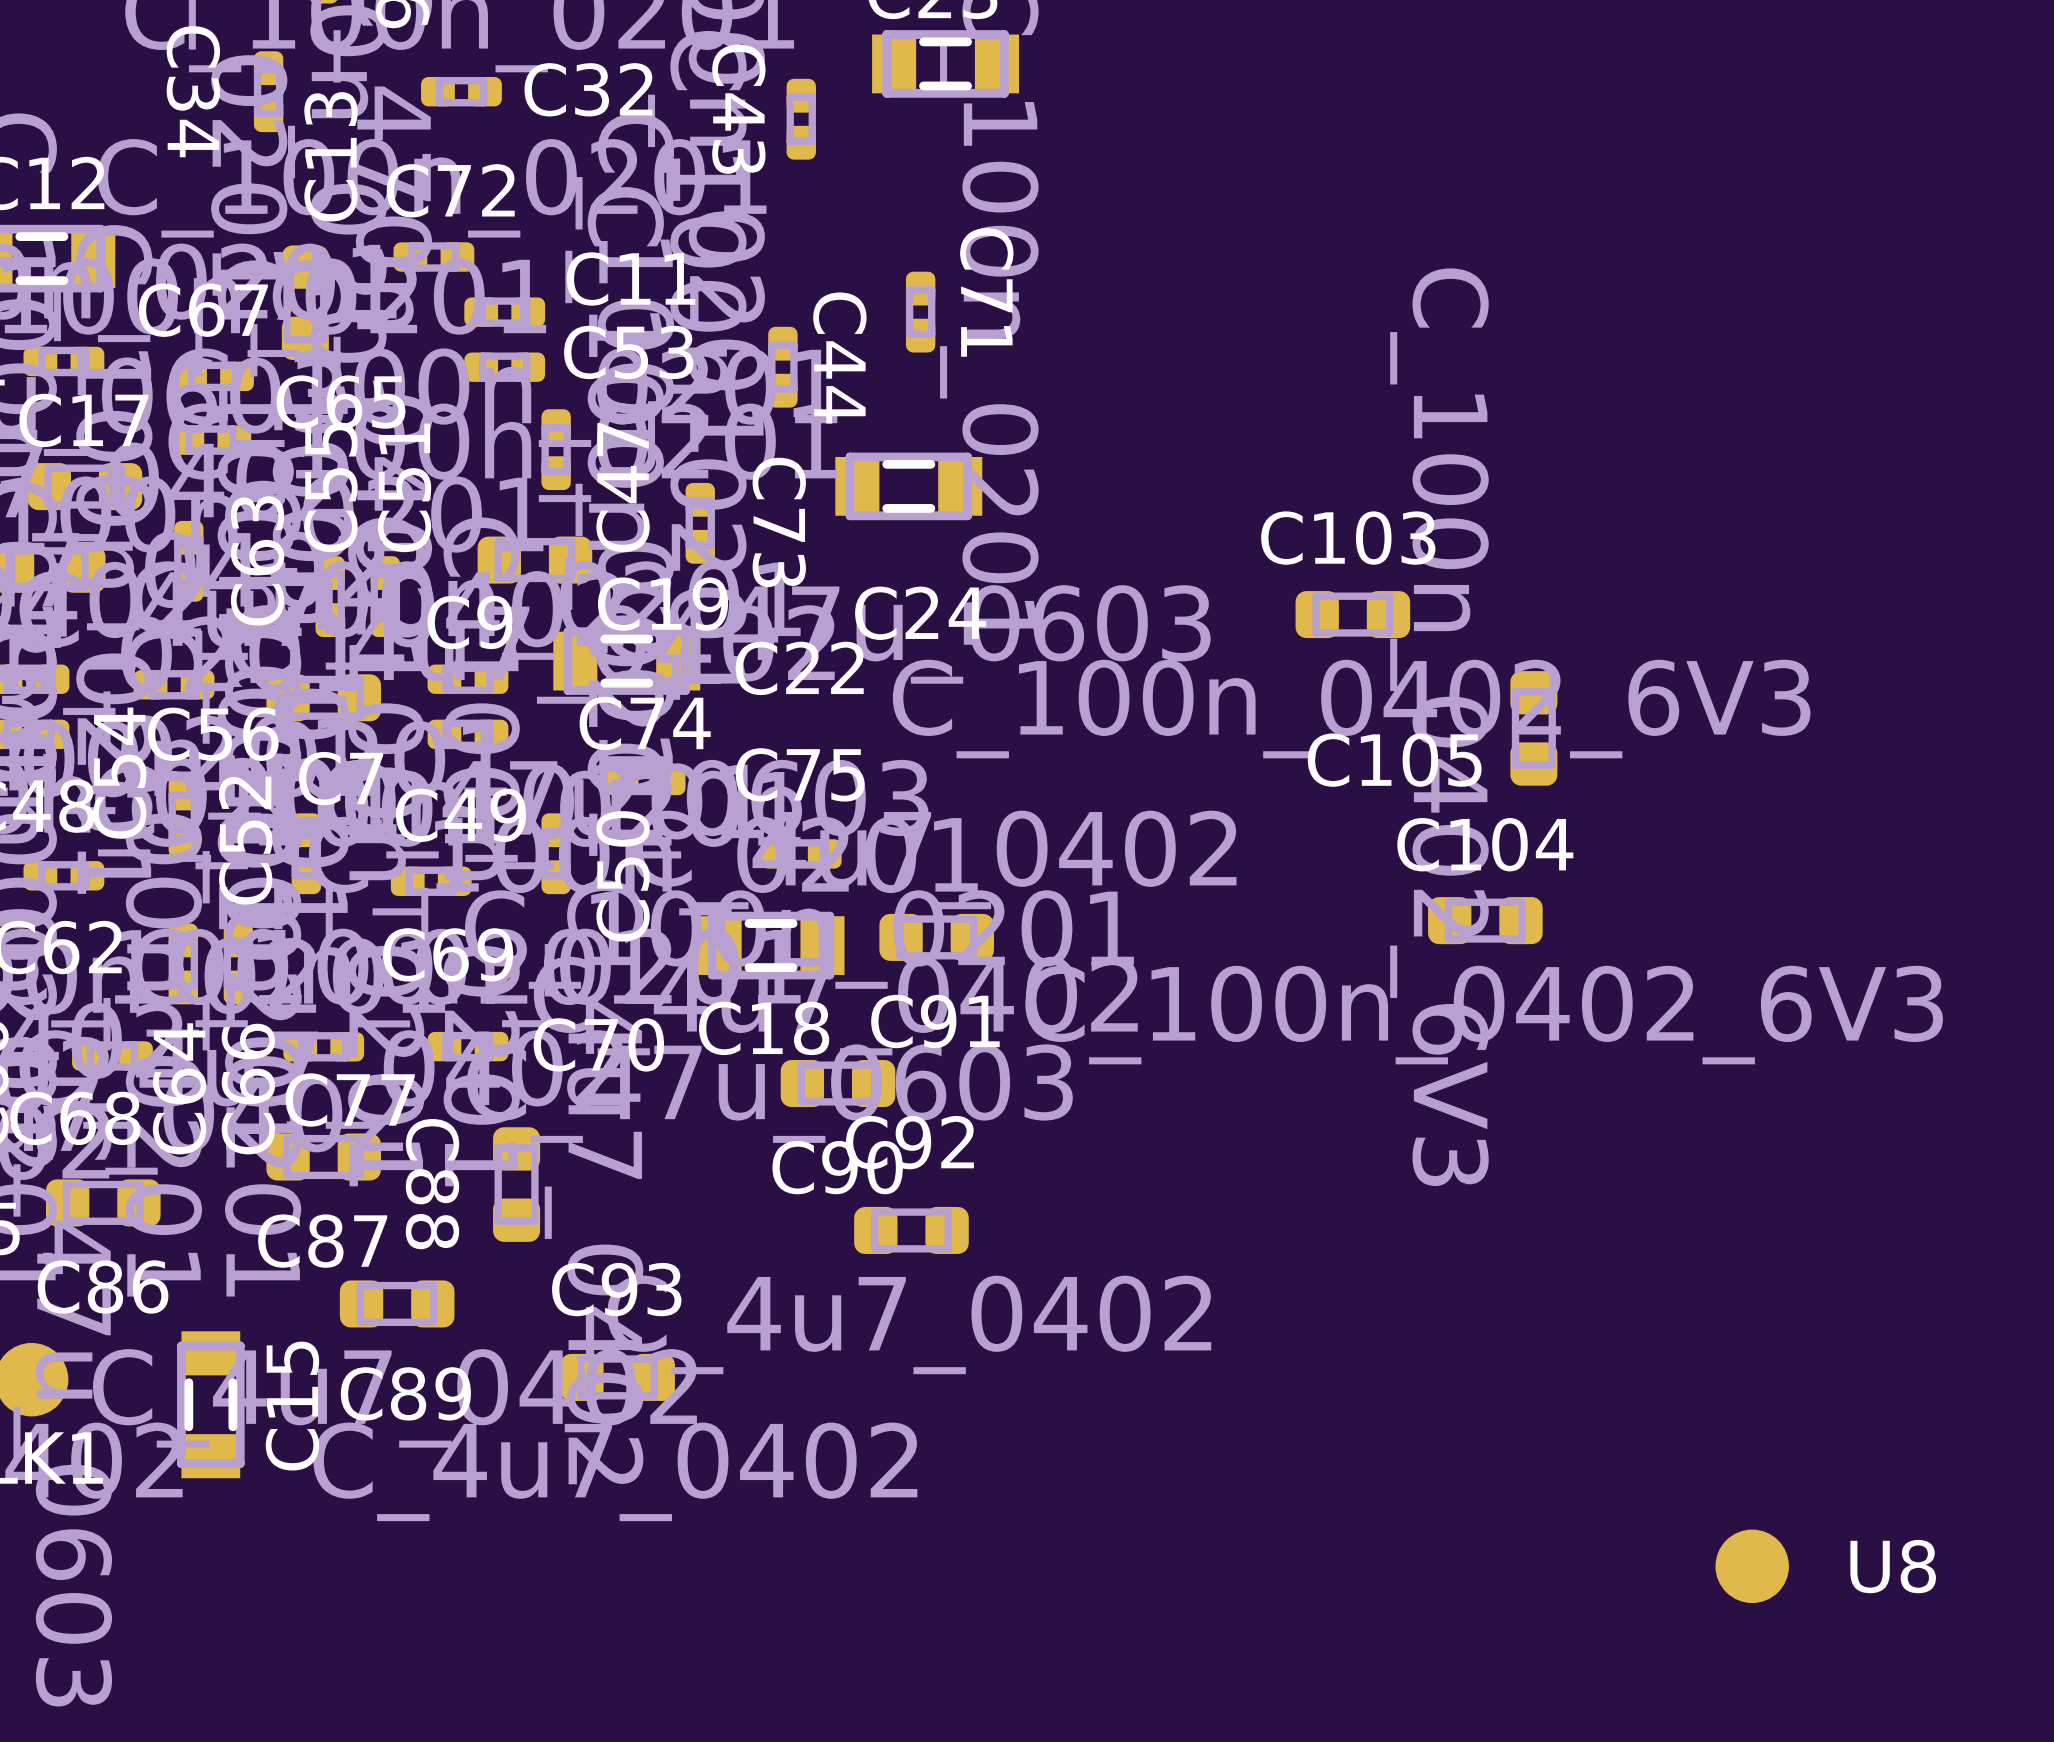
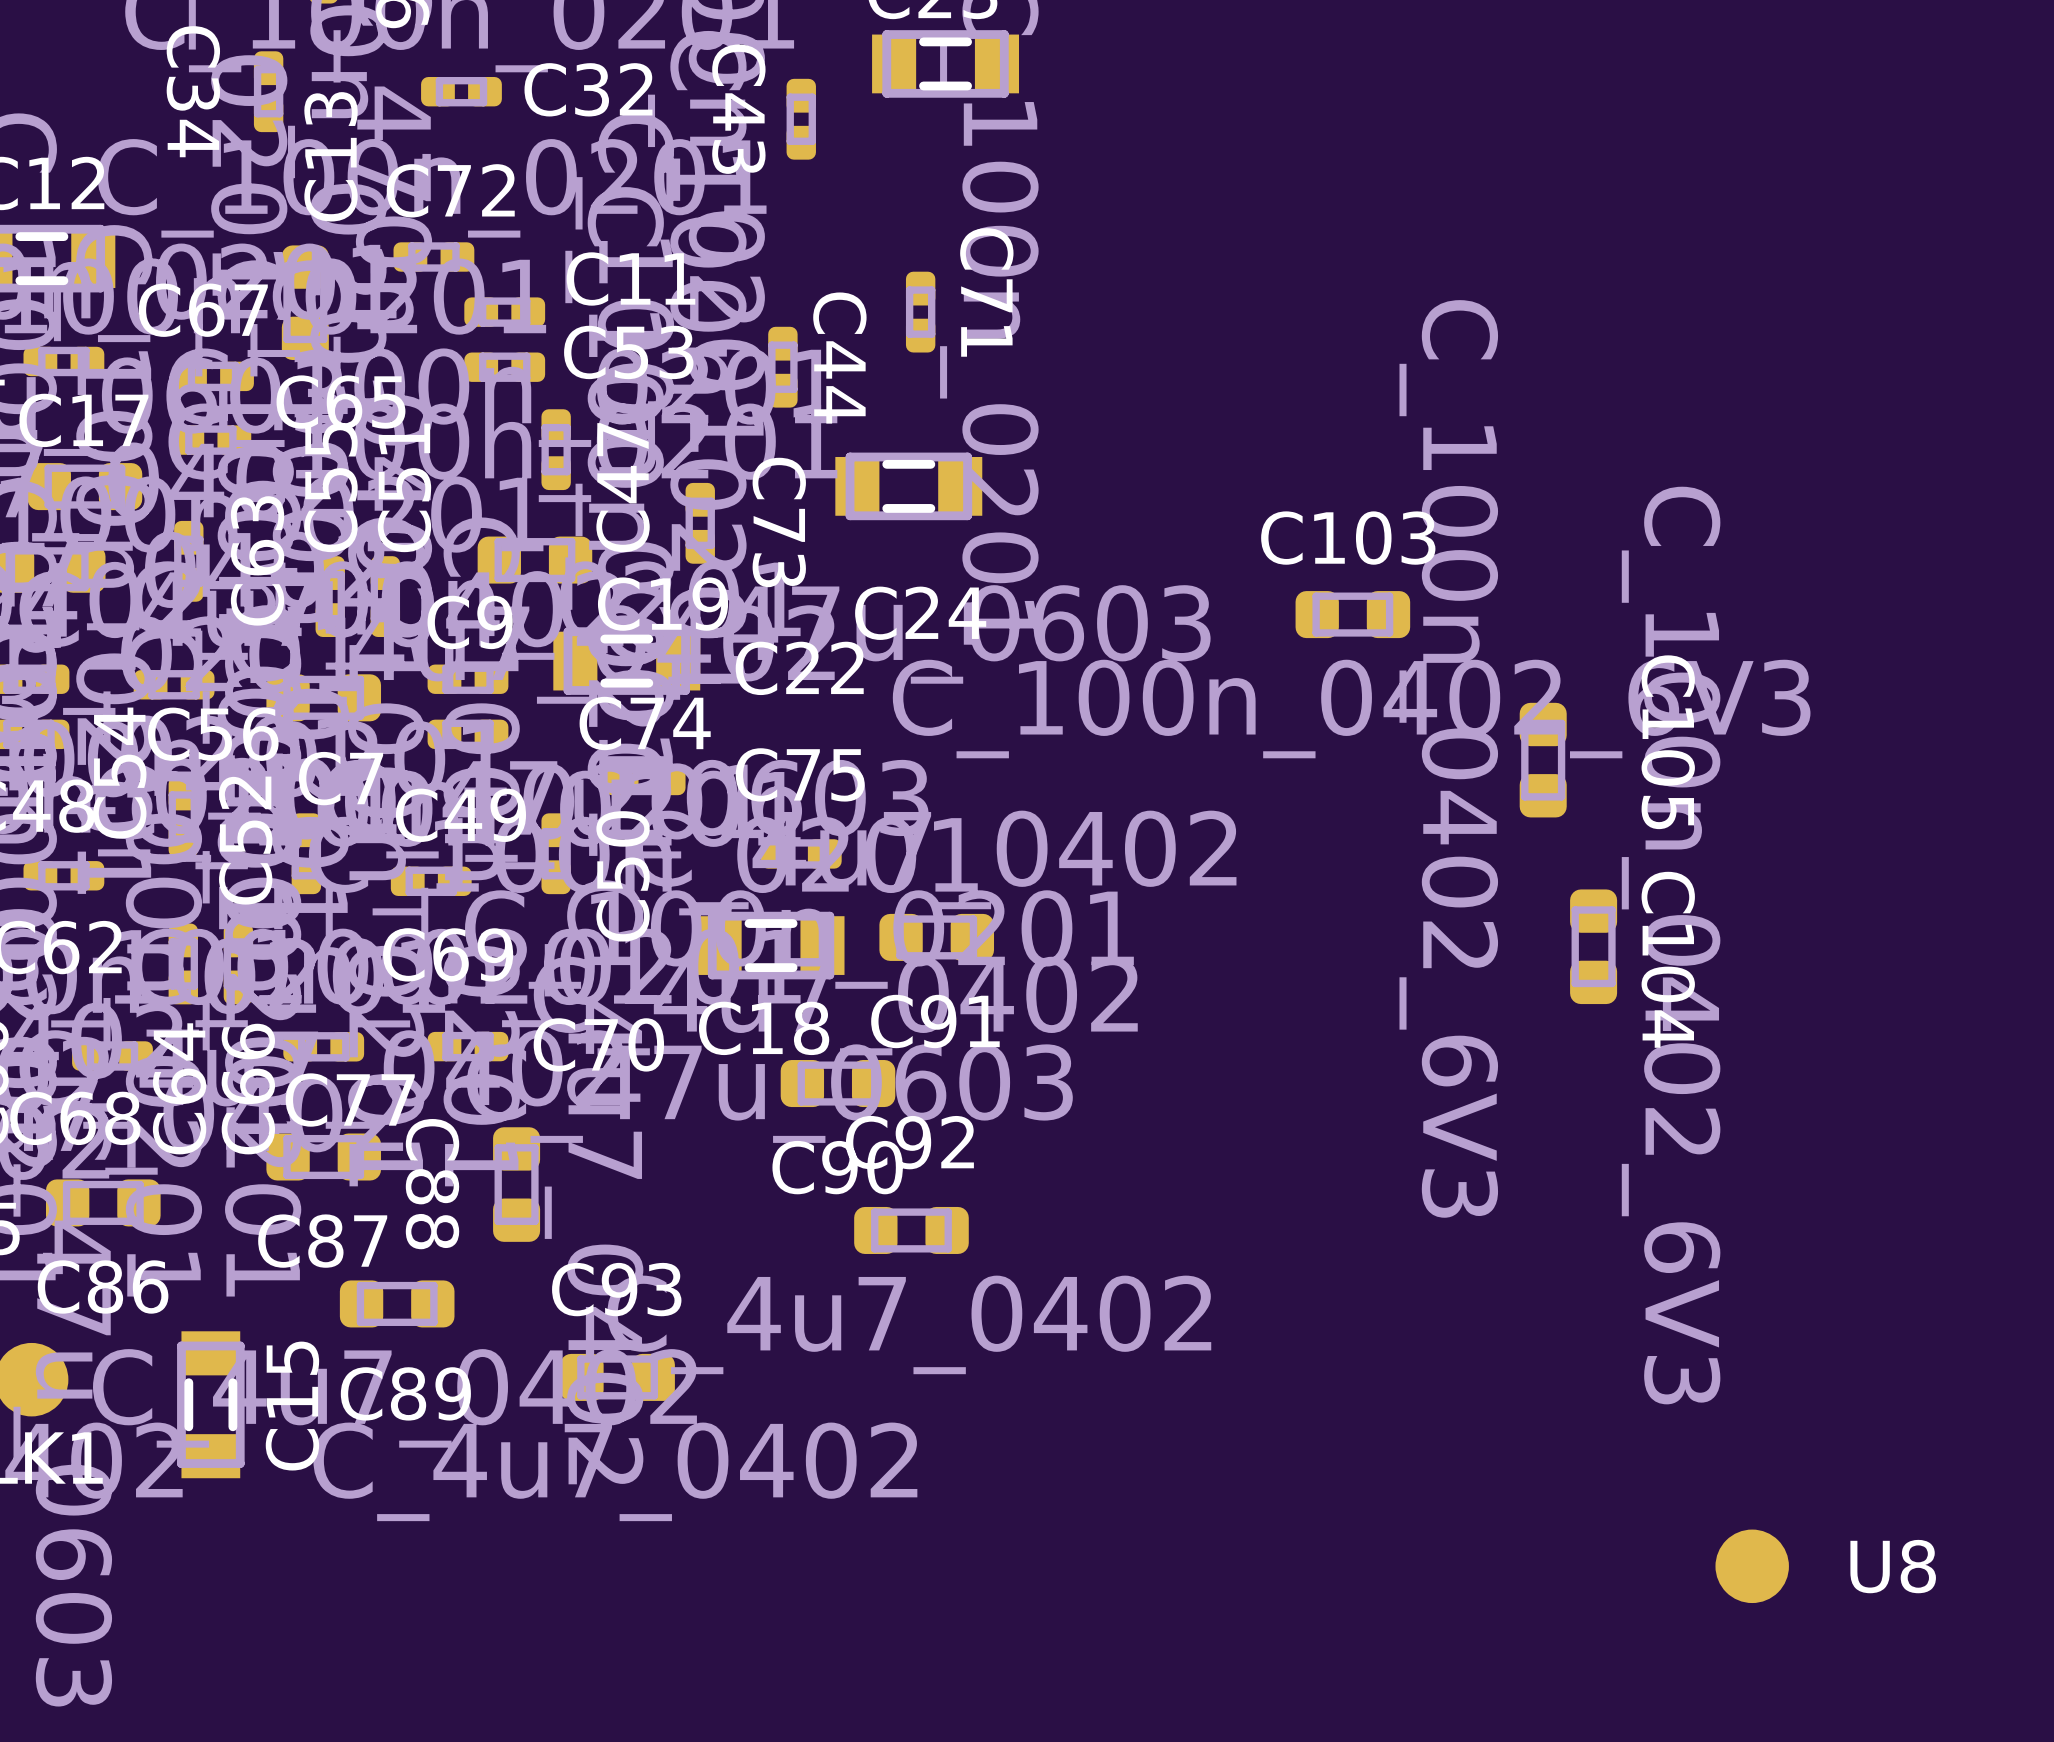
C105 position: (1533, 728) -> (1543, 760)
C105 name rotation: 0° (1394, 760) -> 90° clockwise (1668, 742)
C105 name position: C105 (1394, 760) -> C105 (1668, 742)
C104 rotation: 0° (1485, 920) -> 90° clockwise (1593, 946)
C104 position: (1485, 920) -> (1593, 946)

